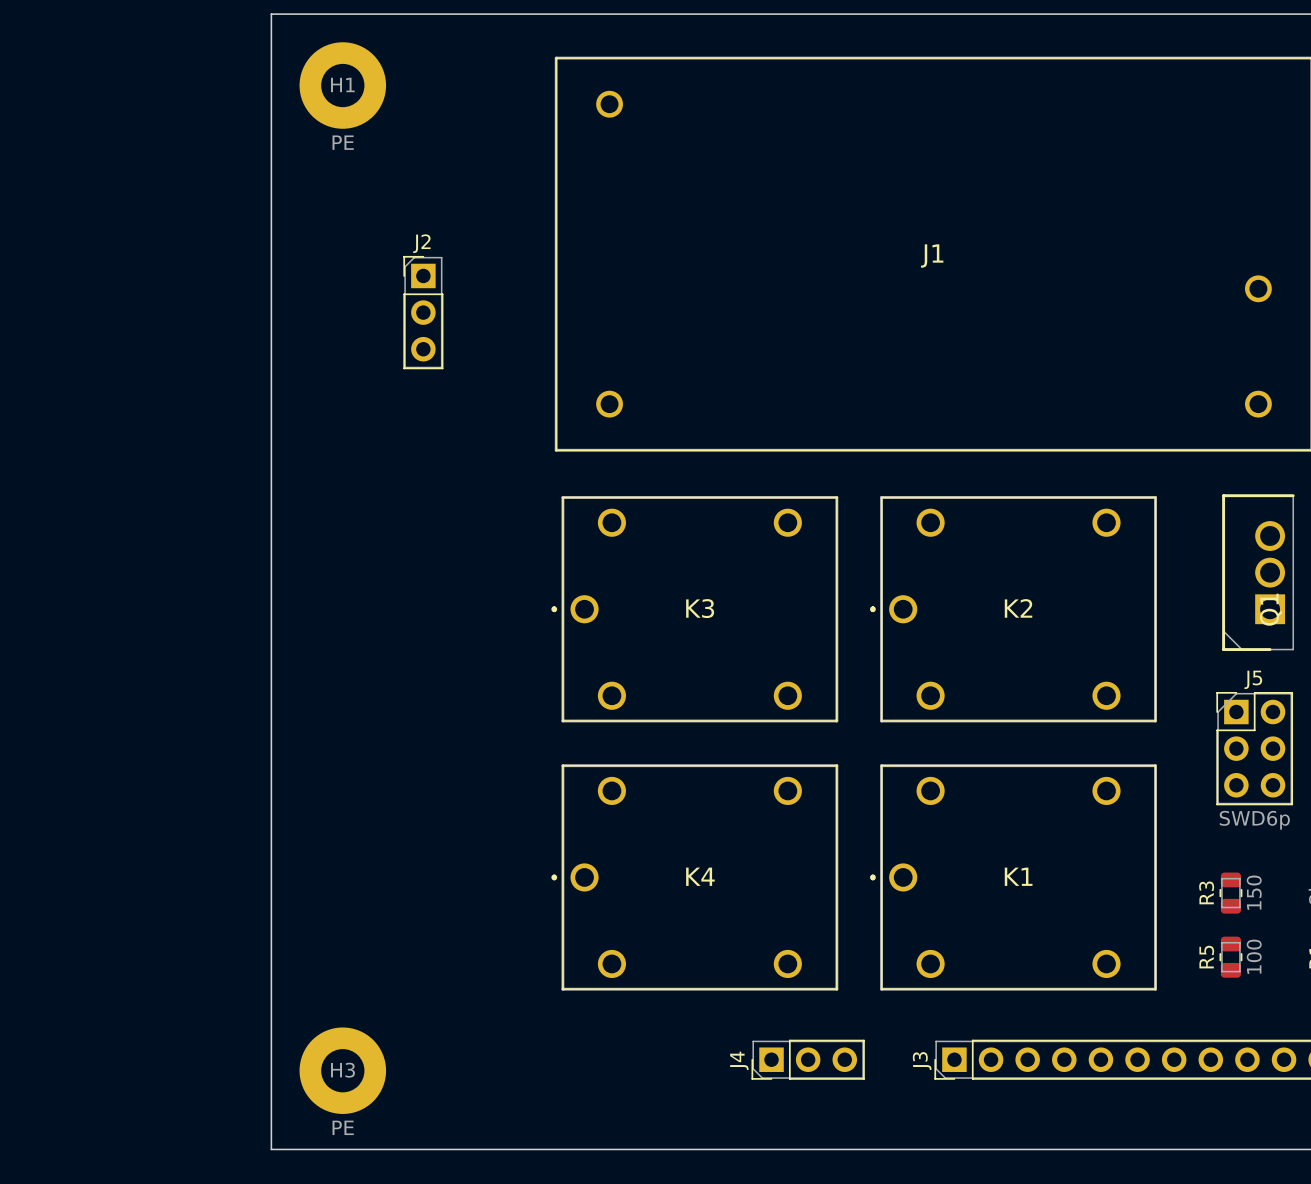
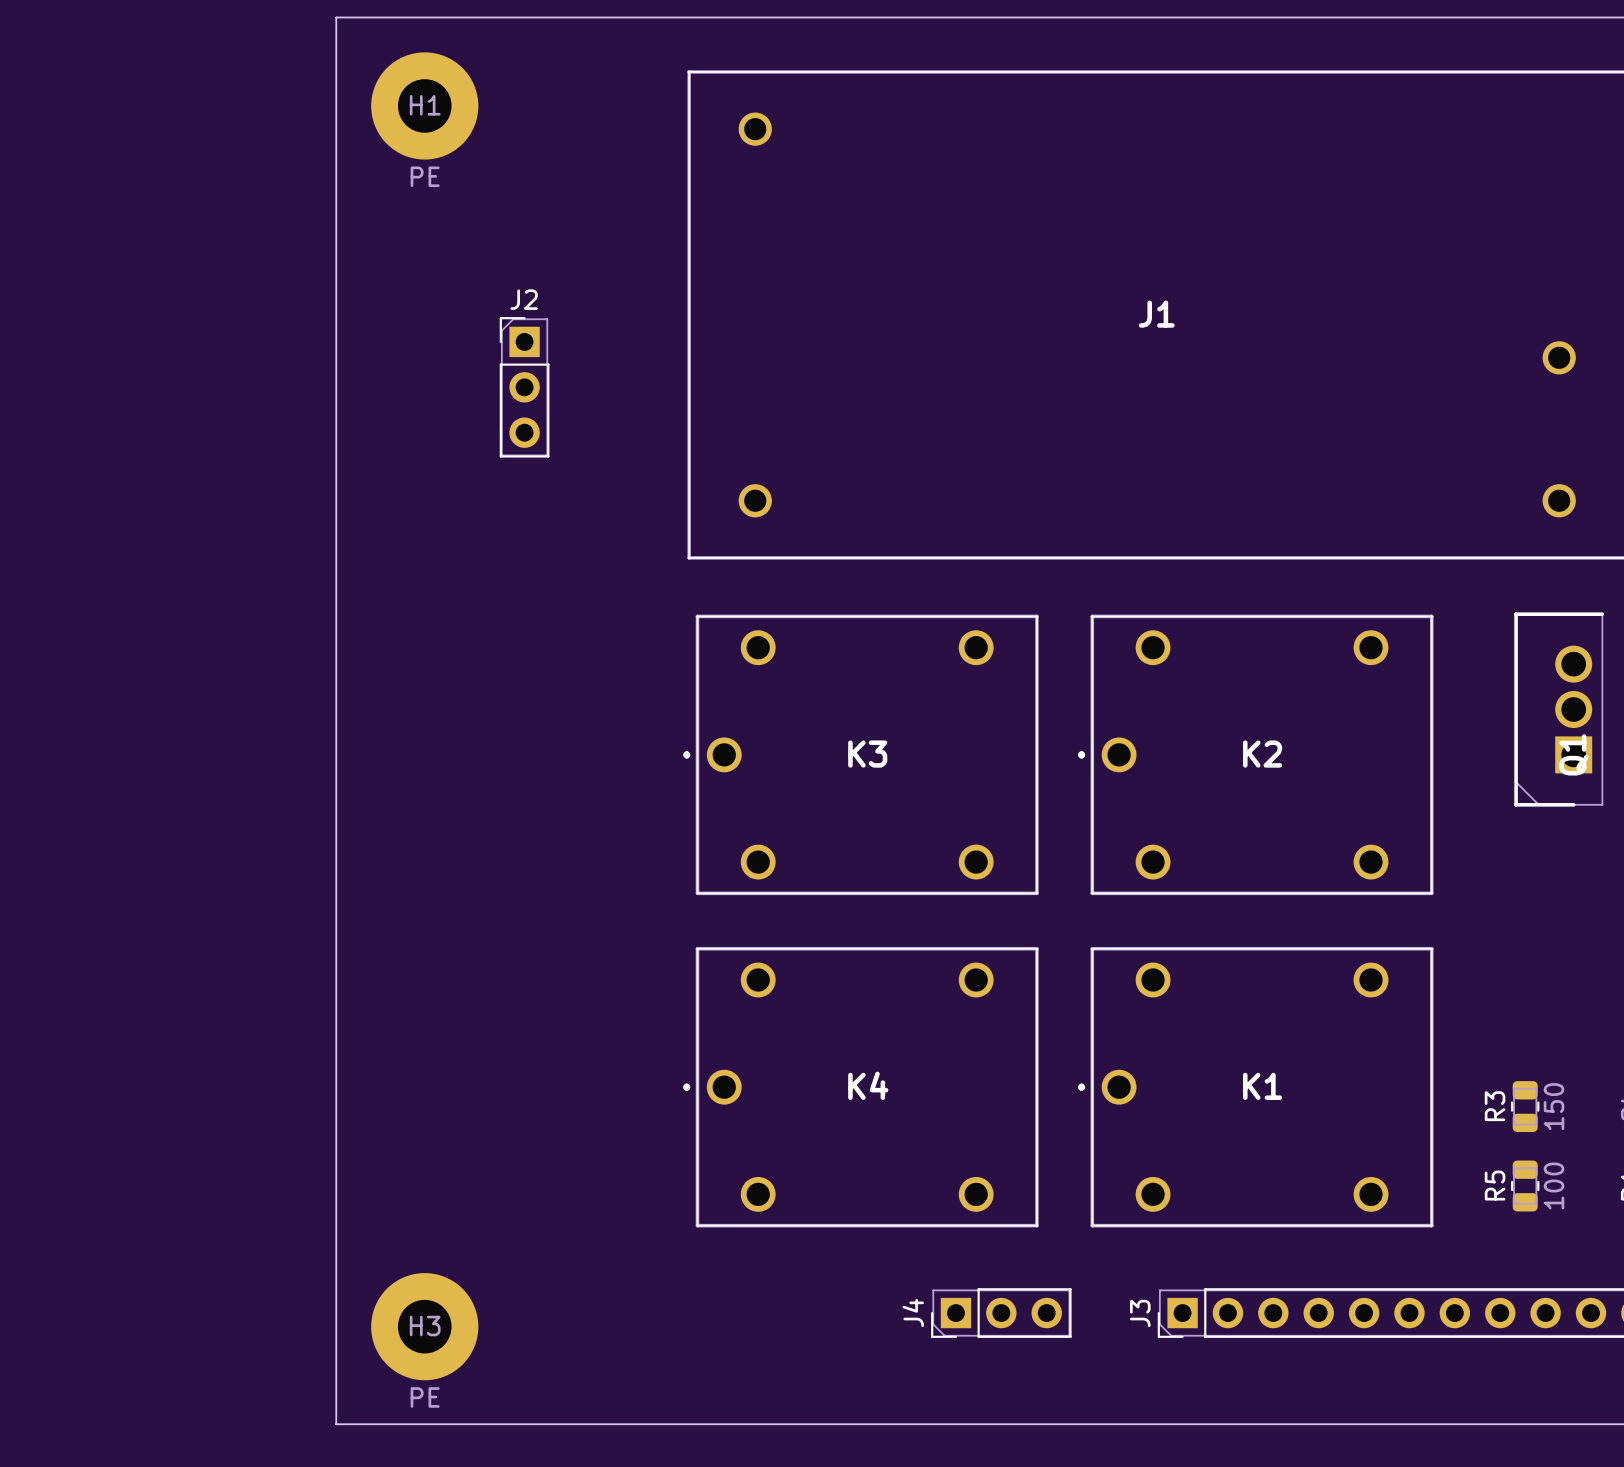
J5: SWD6p (1254, 748) -> none

